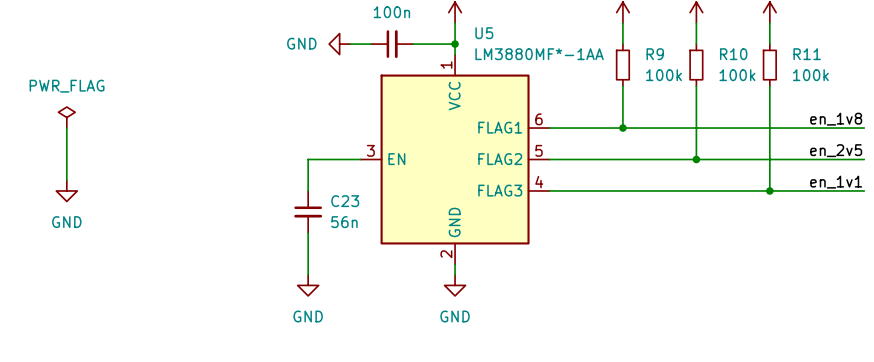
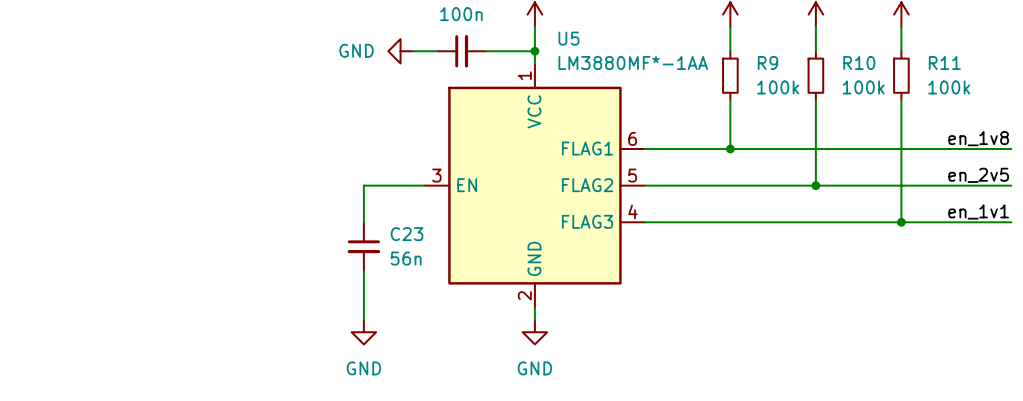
power symbol: PWR_FLAG (66, 117) -> none
wire: (66, 128) (66, 180) -> none
power symbol: GND (66, 190) -> none

